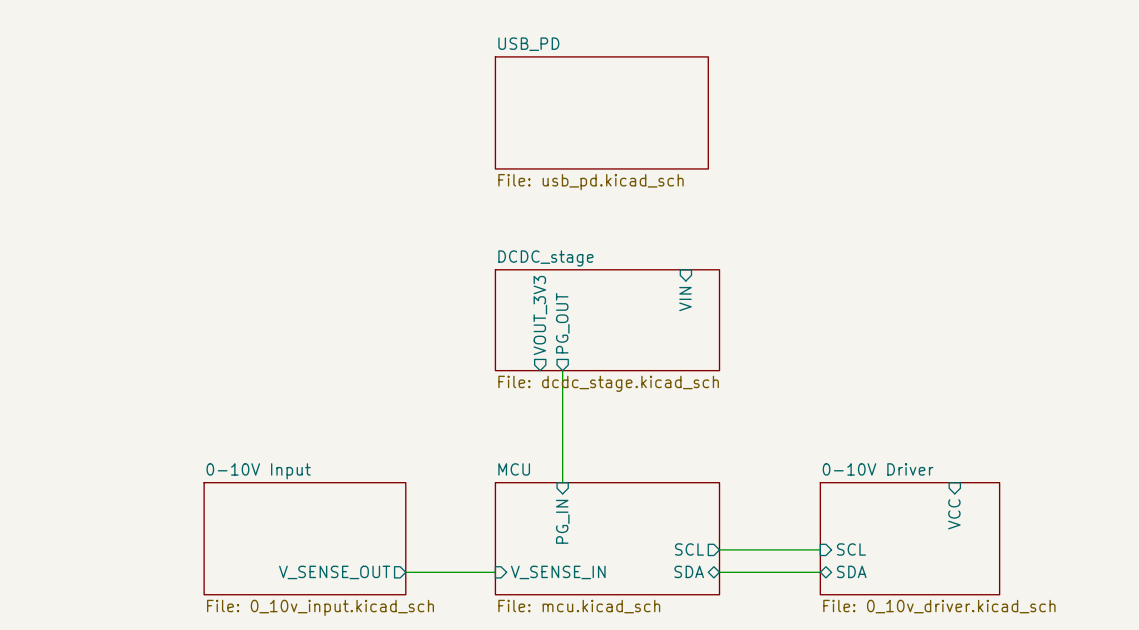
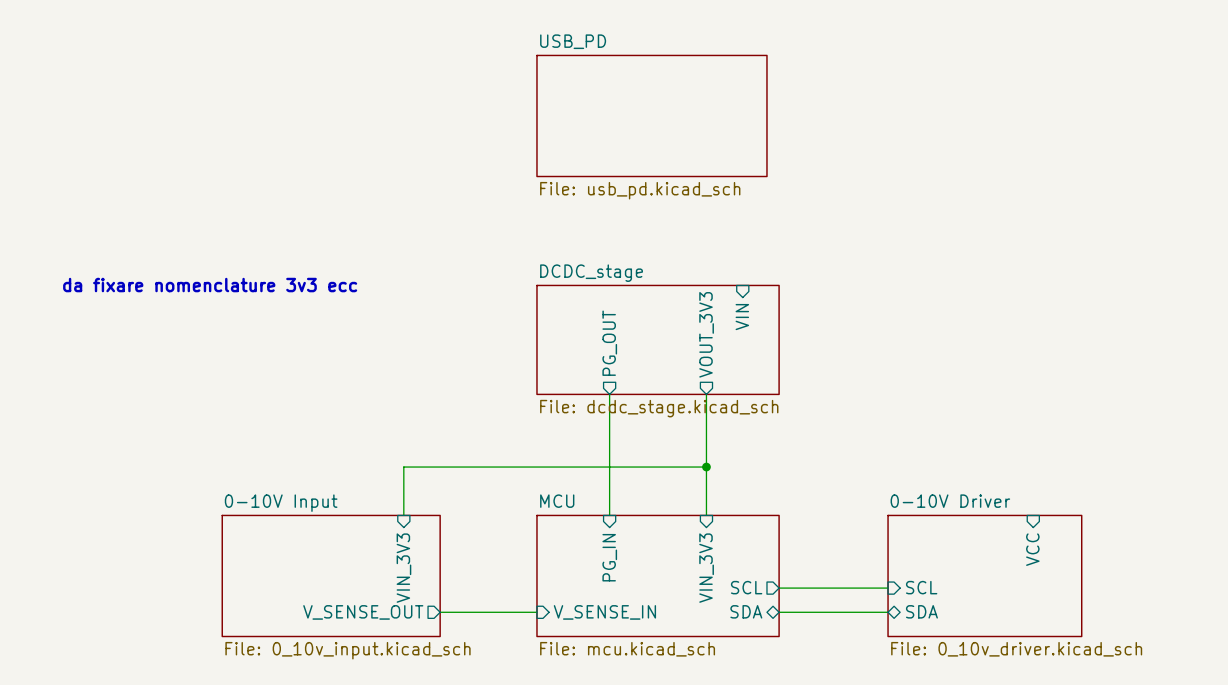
text: none -> da fixare nomenclature 3v3 ecc (210, 285)
sheet pin position: VOUT_3V3 (540, 315) -> VOUT_3V3 (706, 334)
wire: none -> (706, 394) (706, 515)
wire: none -> (706, 467) (403, 467) (403, 515)
junction: none -> (706, 467)
sheet pin: none -> VIN_3V3 (403, 568)
sheet pin: none -> VIN_3V3 (706, 568)

